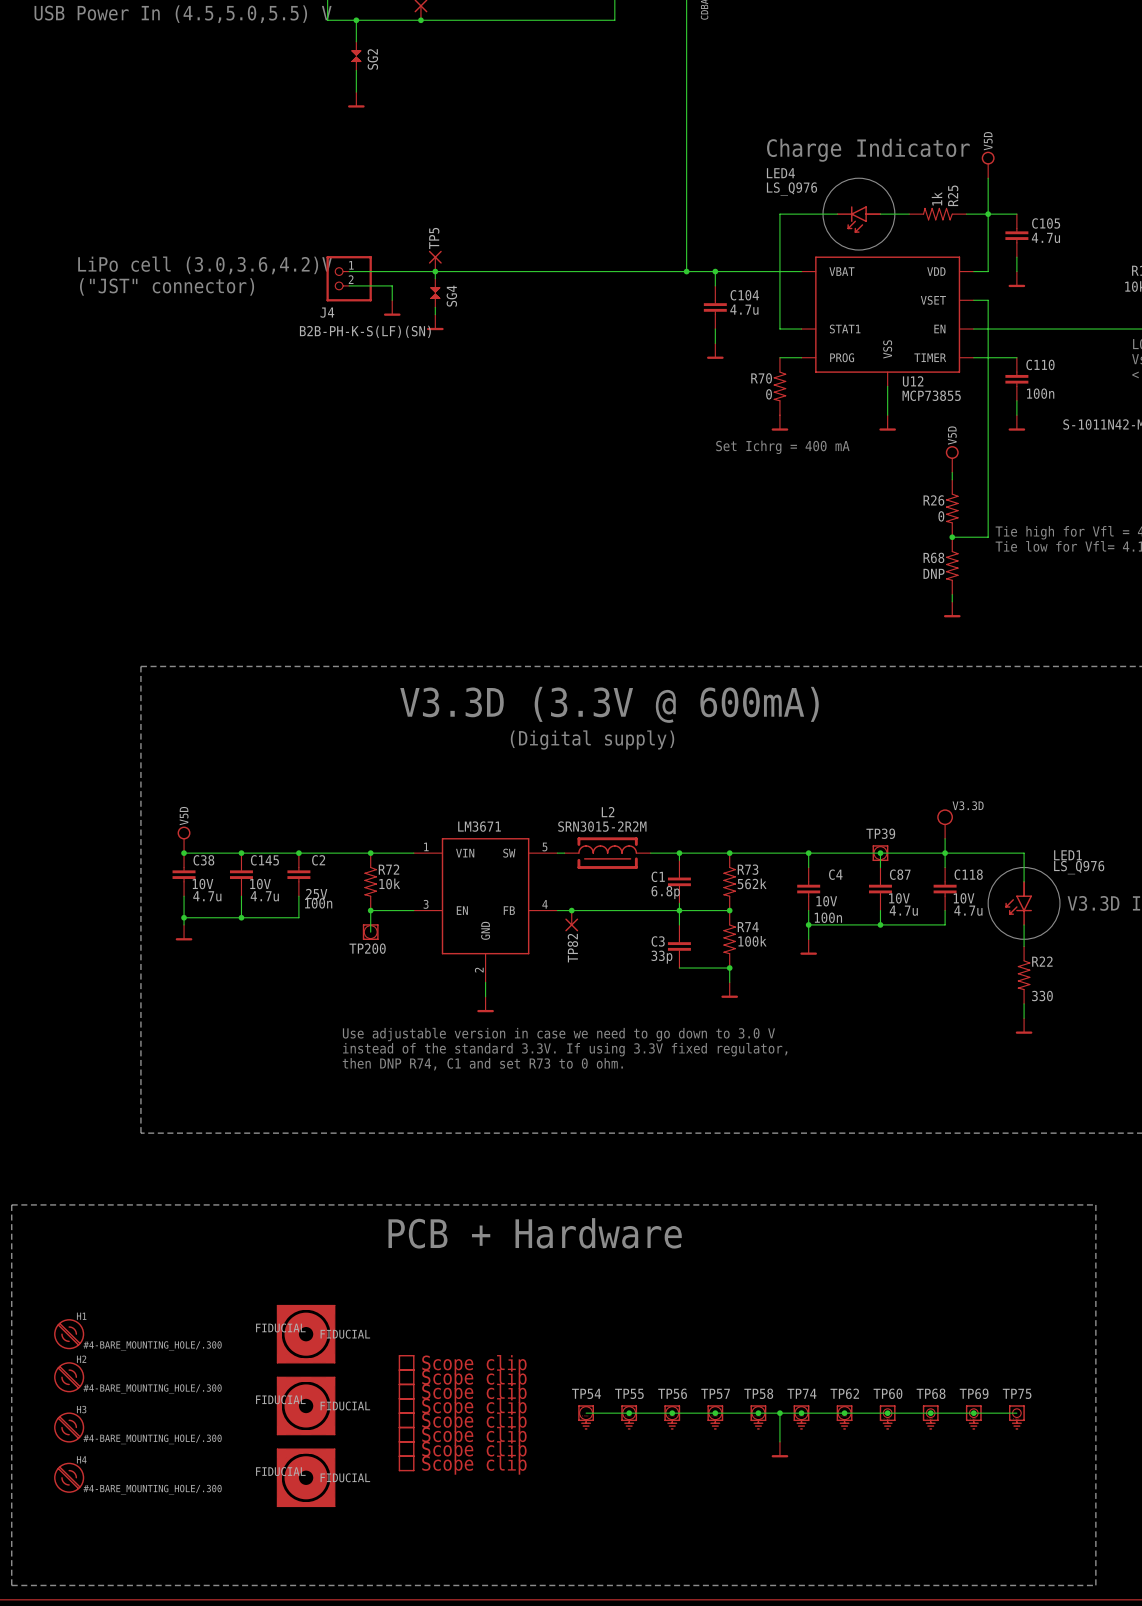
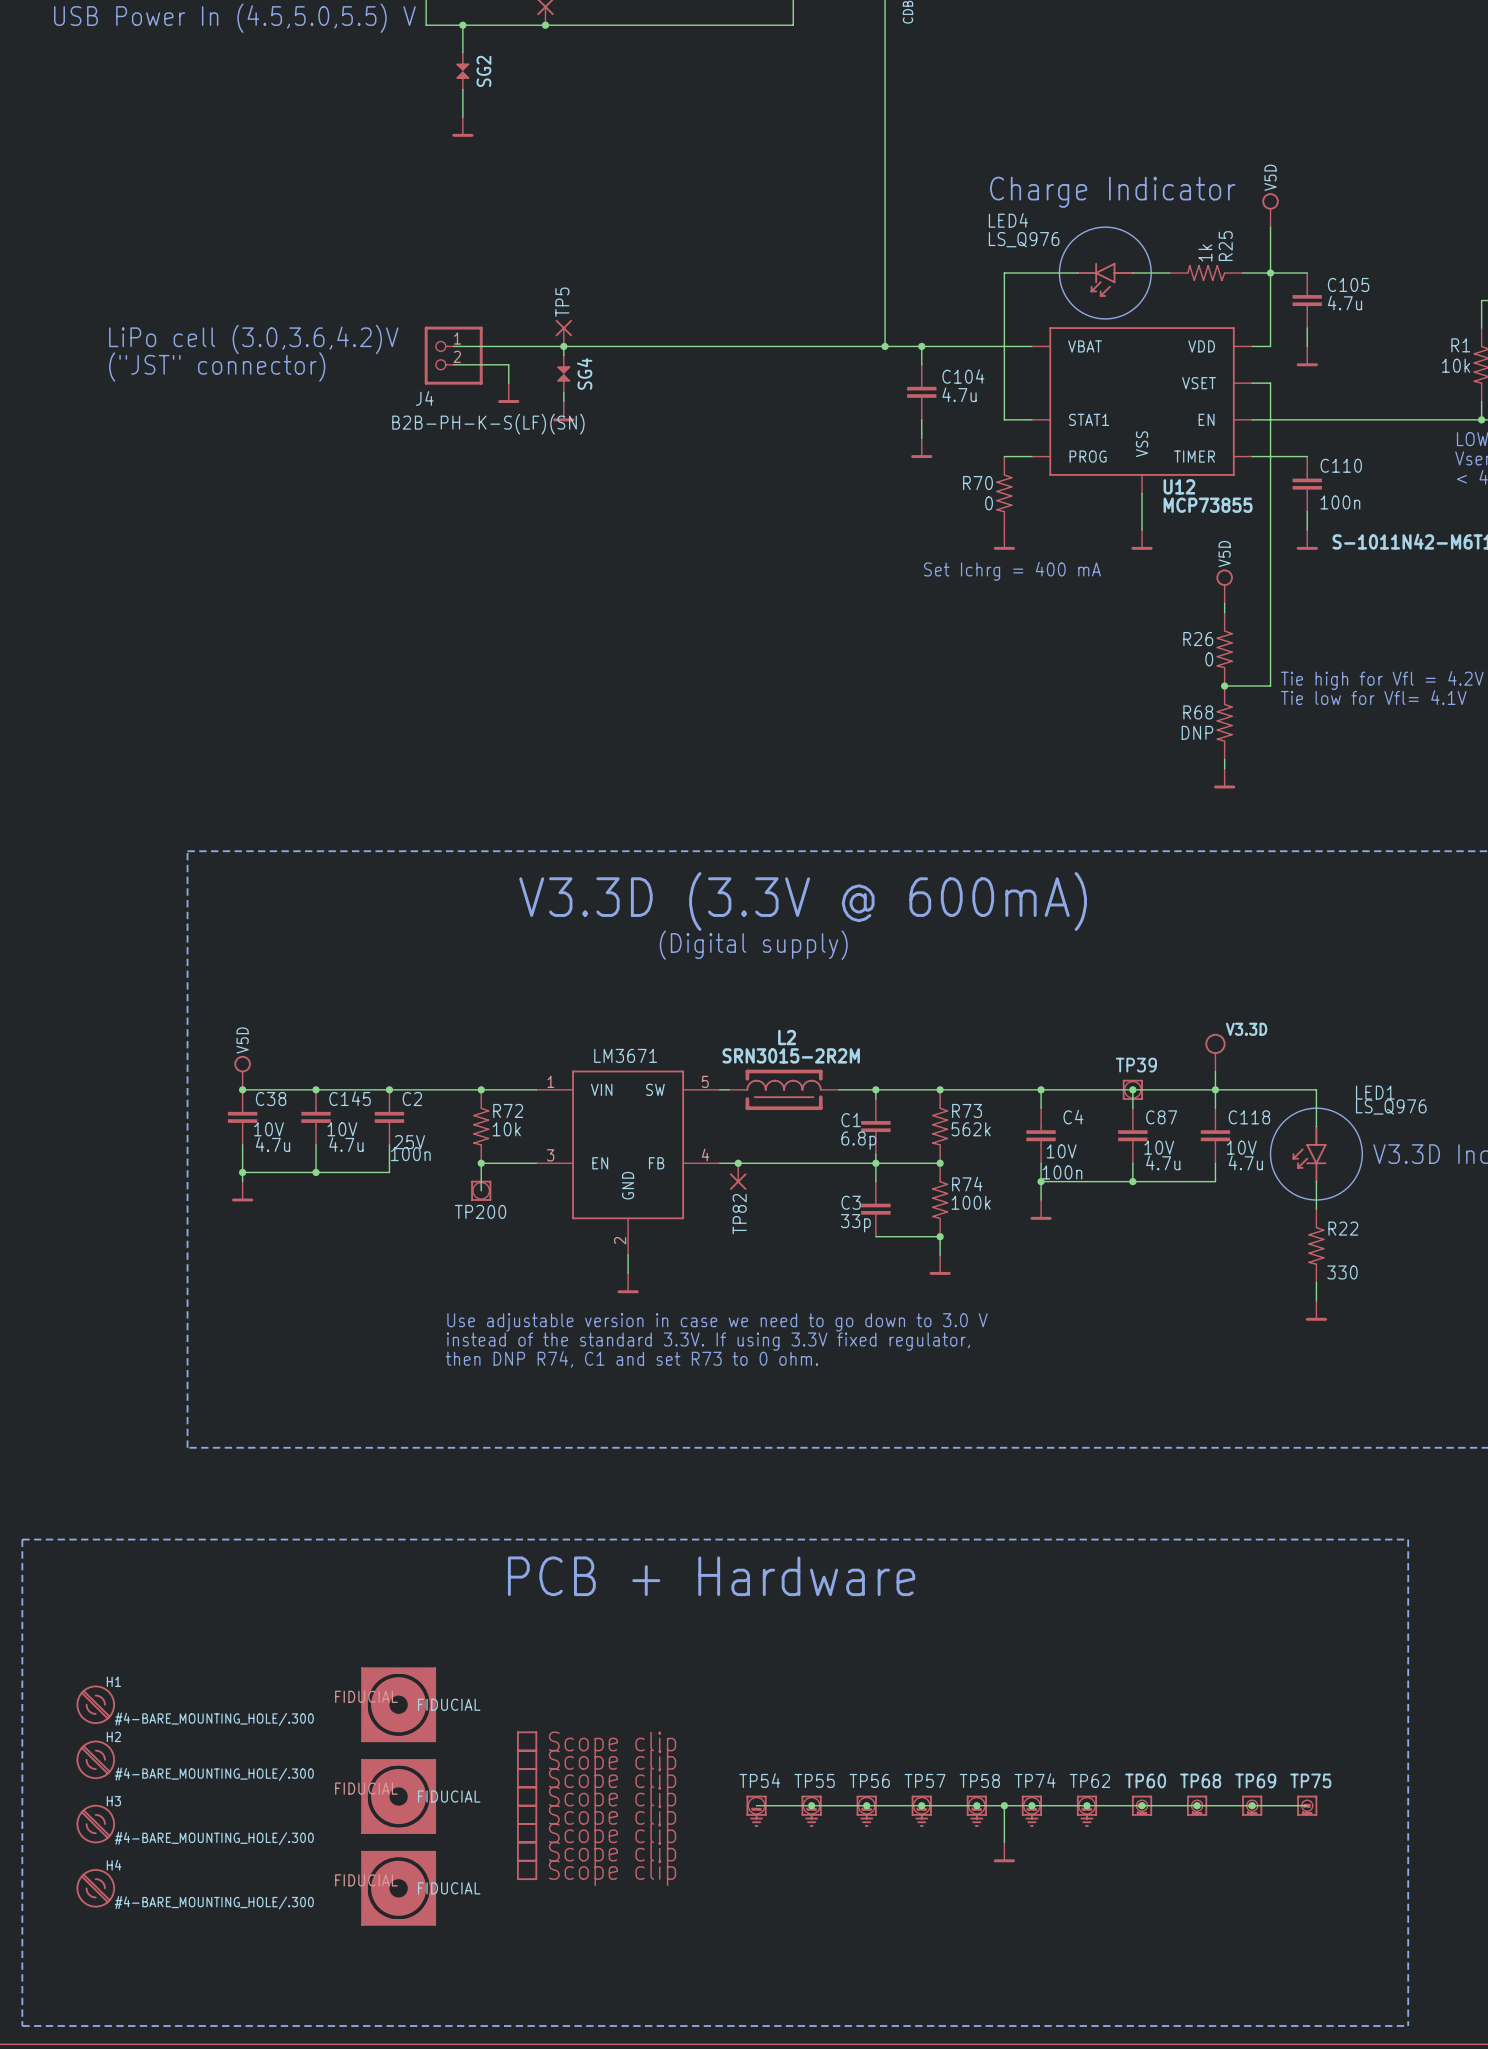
TP60 symbol: [879, 1405, 896, 1430] -> [1131, 1795, 1153, 1816]
TP68 symbol: [922, 1405, 939, 1430] -> [1187, 1795, 1208, 1816]
TP69 symbol: [965, 1405, 982, 1430] -> [1242, 1795, 1263, 1816]
TP75 symbol: [1008, 1405, 1025, 1430] -> [1297, 1795, 1318, 1816]

